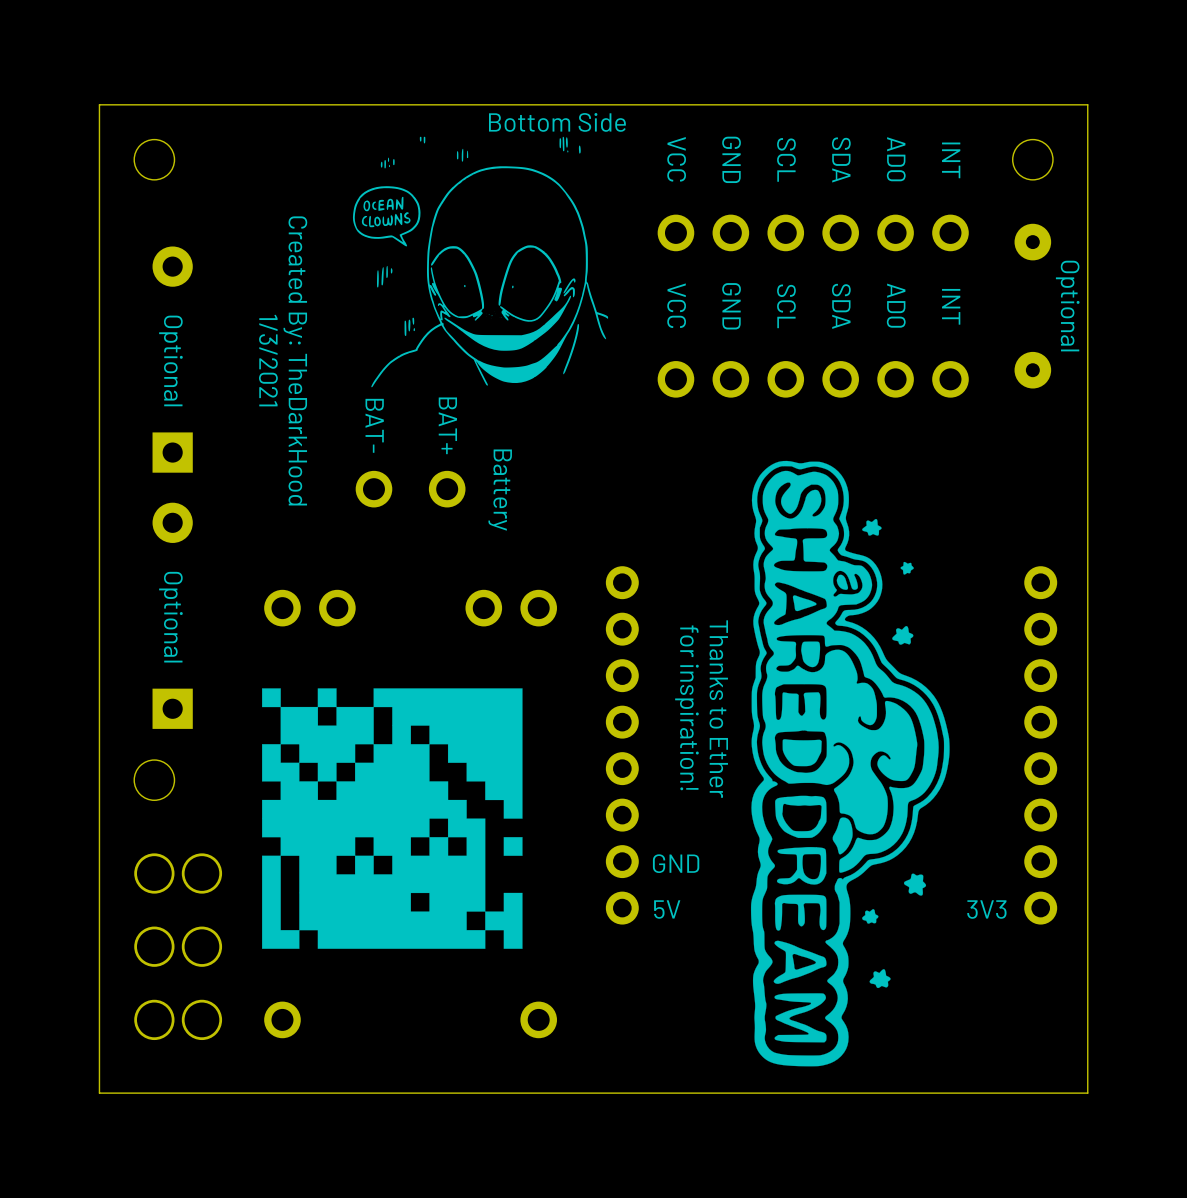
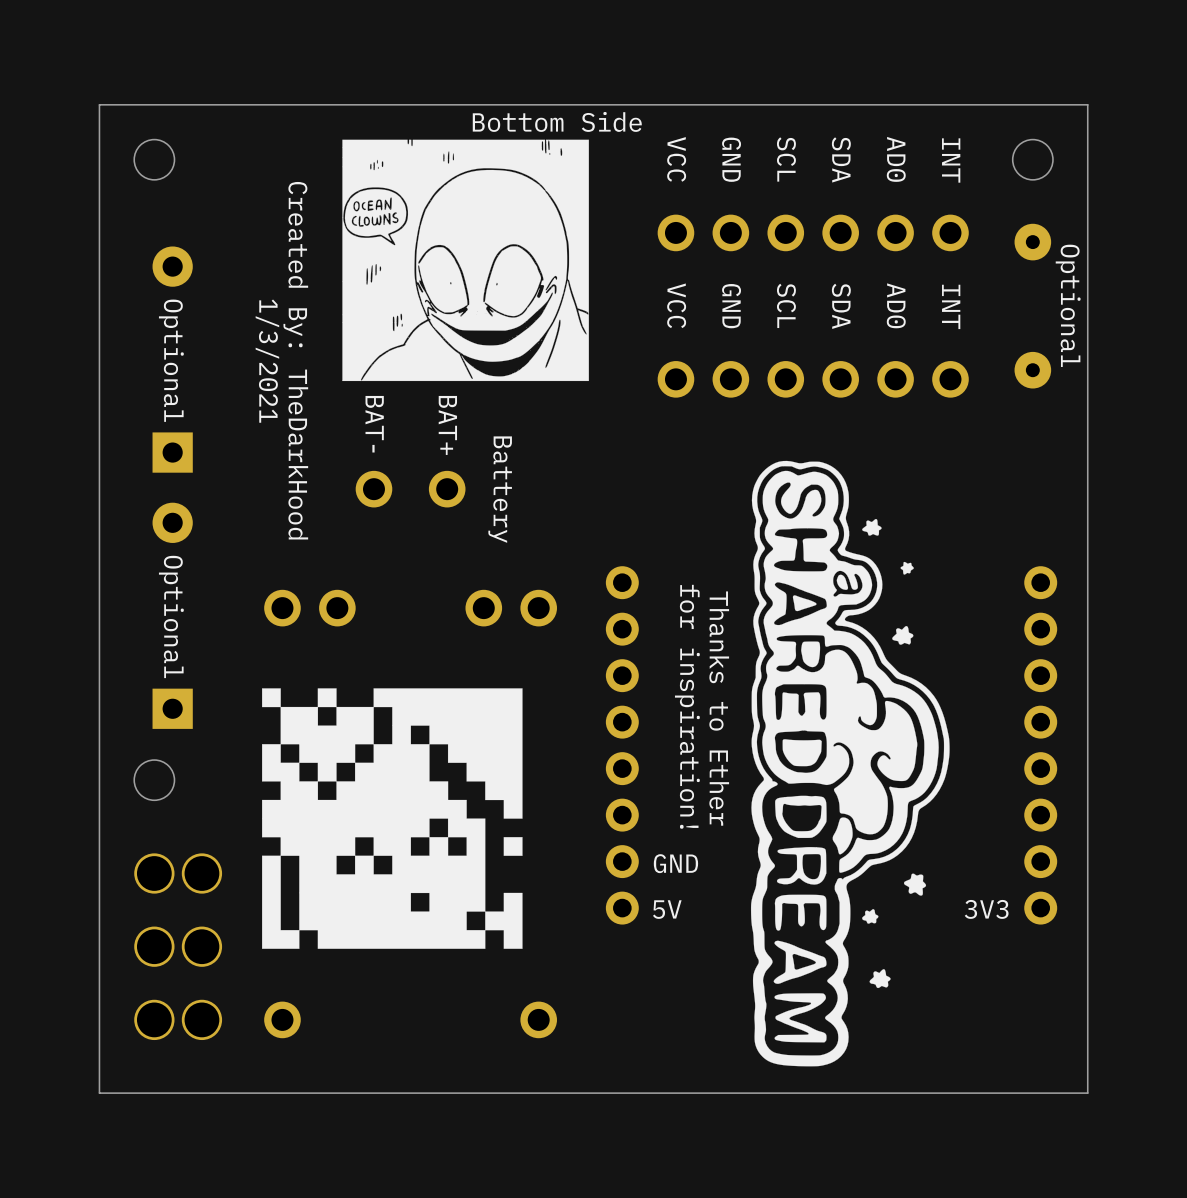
drawing shape: [352, 136, 609, 388] -> [342, 139, 589, 382]

